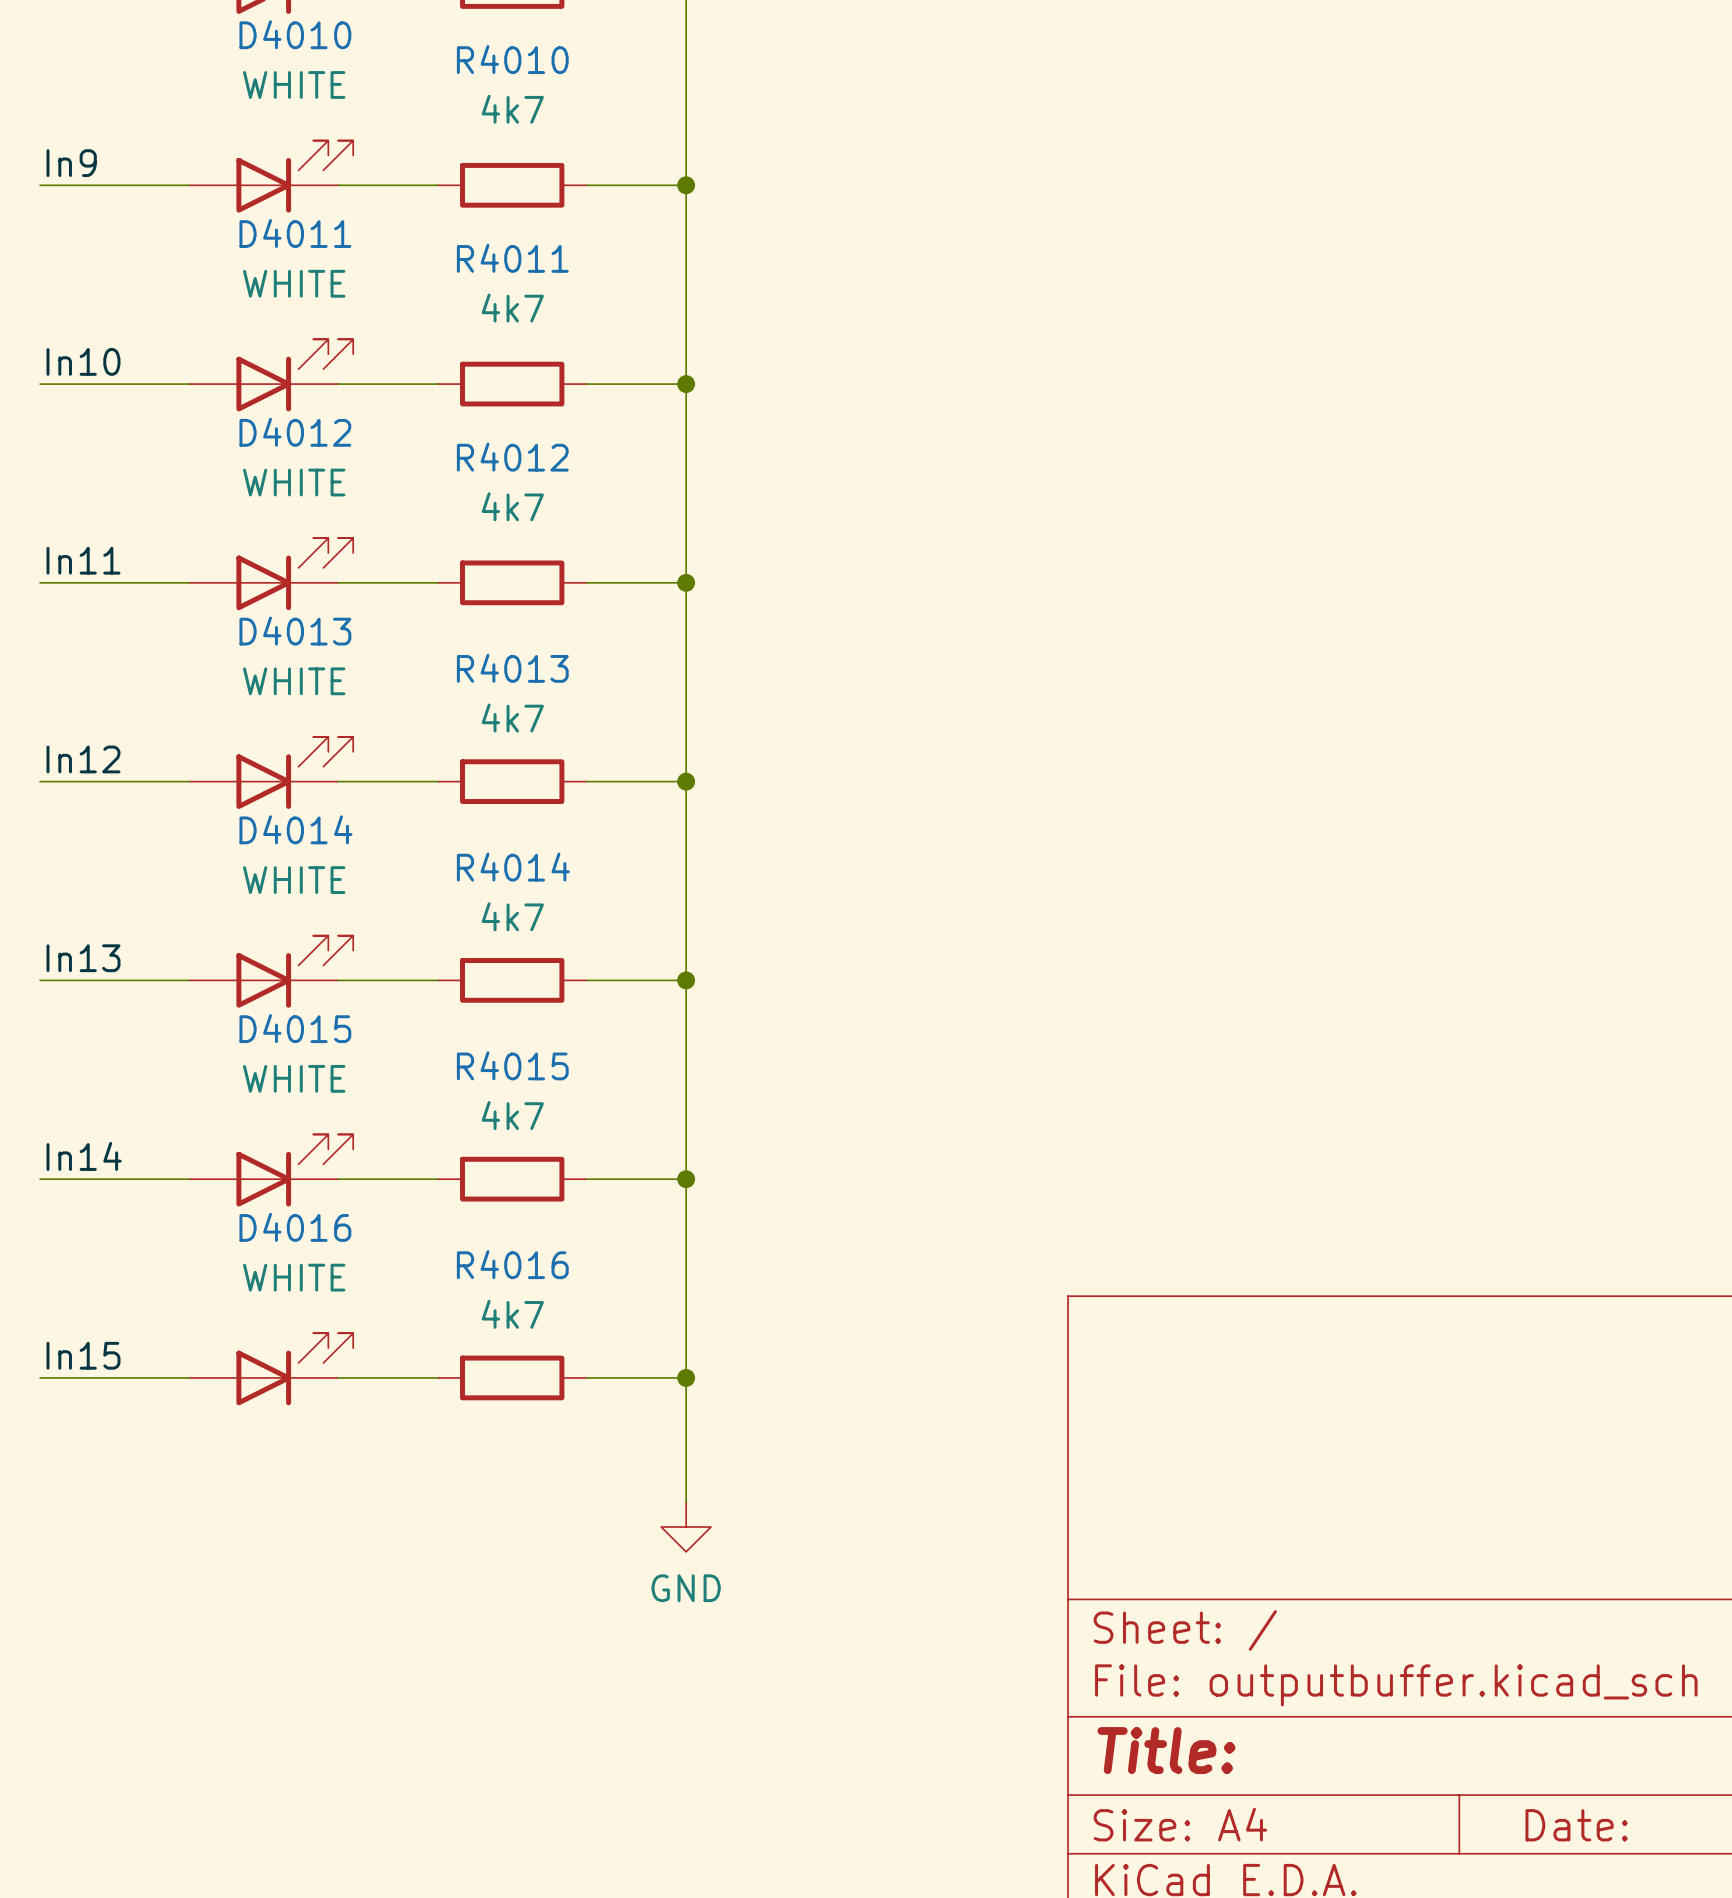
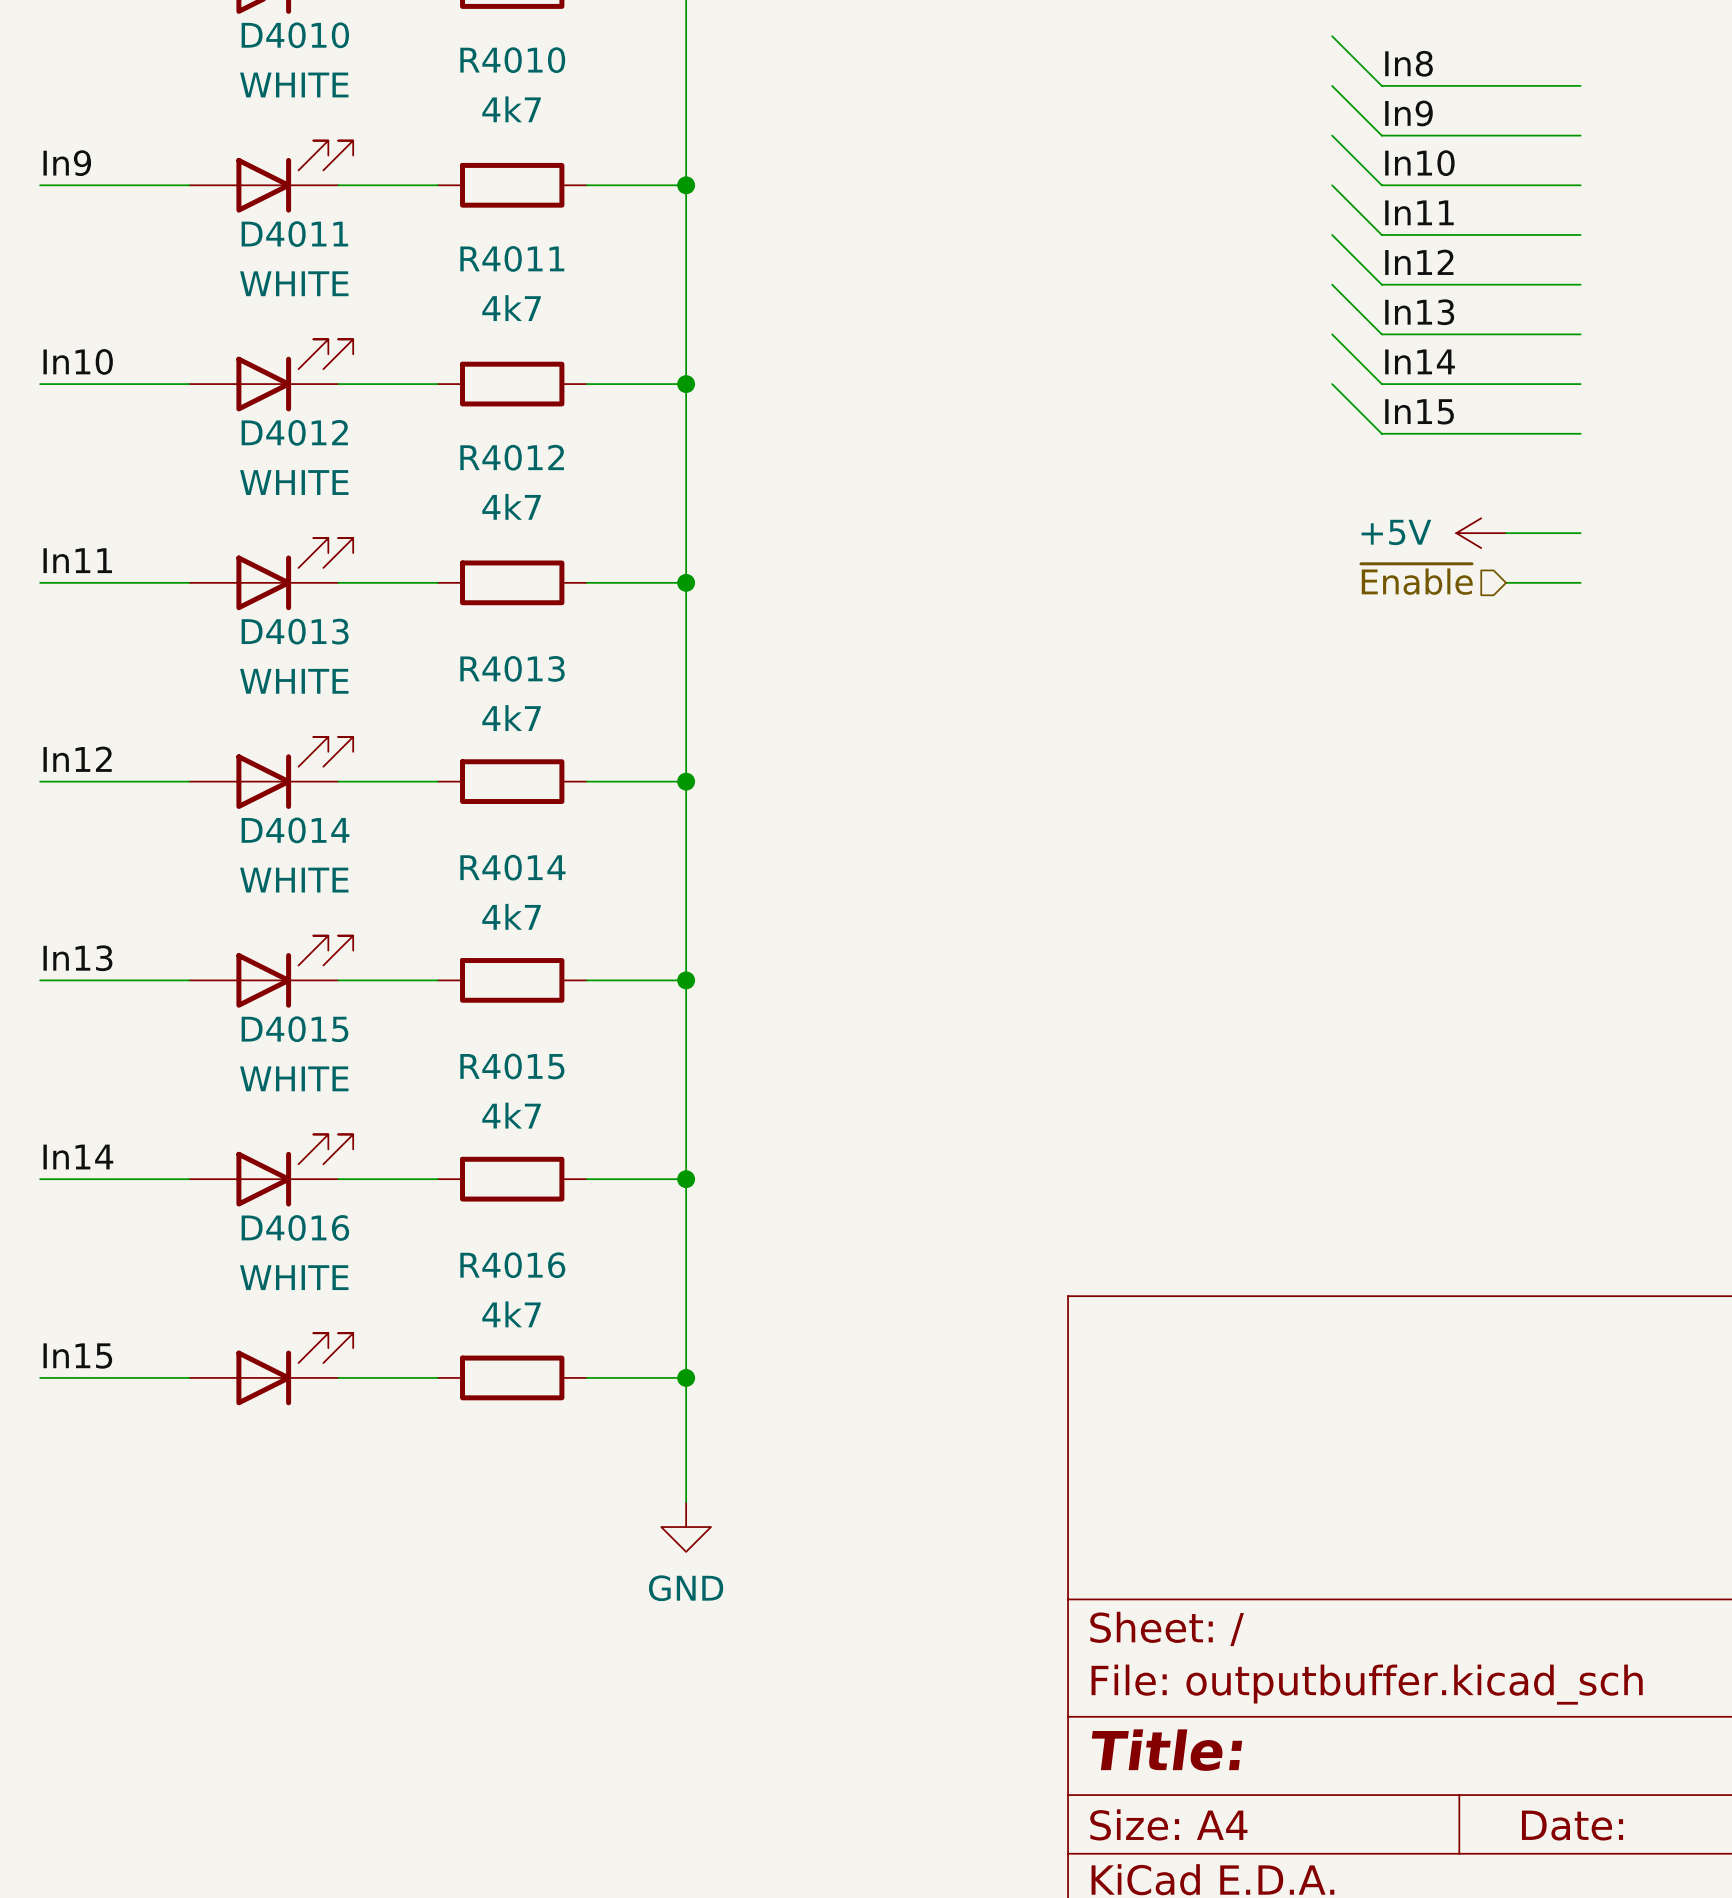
wire: none -> (1332, 36) (1381, 85) (1580, 85)
label: none -> In8 (1409, 63)
wire: none -> (1332, 85) (1381, 135) (1580, 135)
label: none -> In9 (1408, 113)
wire: none -> (1332, 135) (1381, 185) (1580, 185)
label: none -> In10 (1419, 163)
wire: none -> (1332, 185) (1381, 235) (1580, 235)
label: none -> In11 (1419, 212)
wire: none -> (1332, 235) (1381, 284) (1580, 284)
label: none -> In12 (1419, 262)
wire: none -> (1332, 284) (1381, 334) (1580, 334)
label: none -> In13 (1419, 312)
wire: none -> (1332, 334) (1381, 384) (1580, 384)
label: none -> In14 (1420, 361)
wire: none -> (1332, 384) (1381, 433) (1580, 433)
label: none -> In15 (1419, 411)
power symbol: none -> +5V (1481, 533)
wire: none -> (1506, 533) (1580, 533)
hierarchical label: none -> ~{Enable} (1416, 579)
wire: none -> (1506, 582) (1580, 582)

